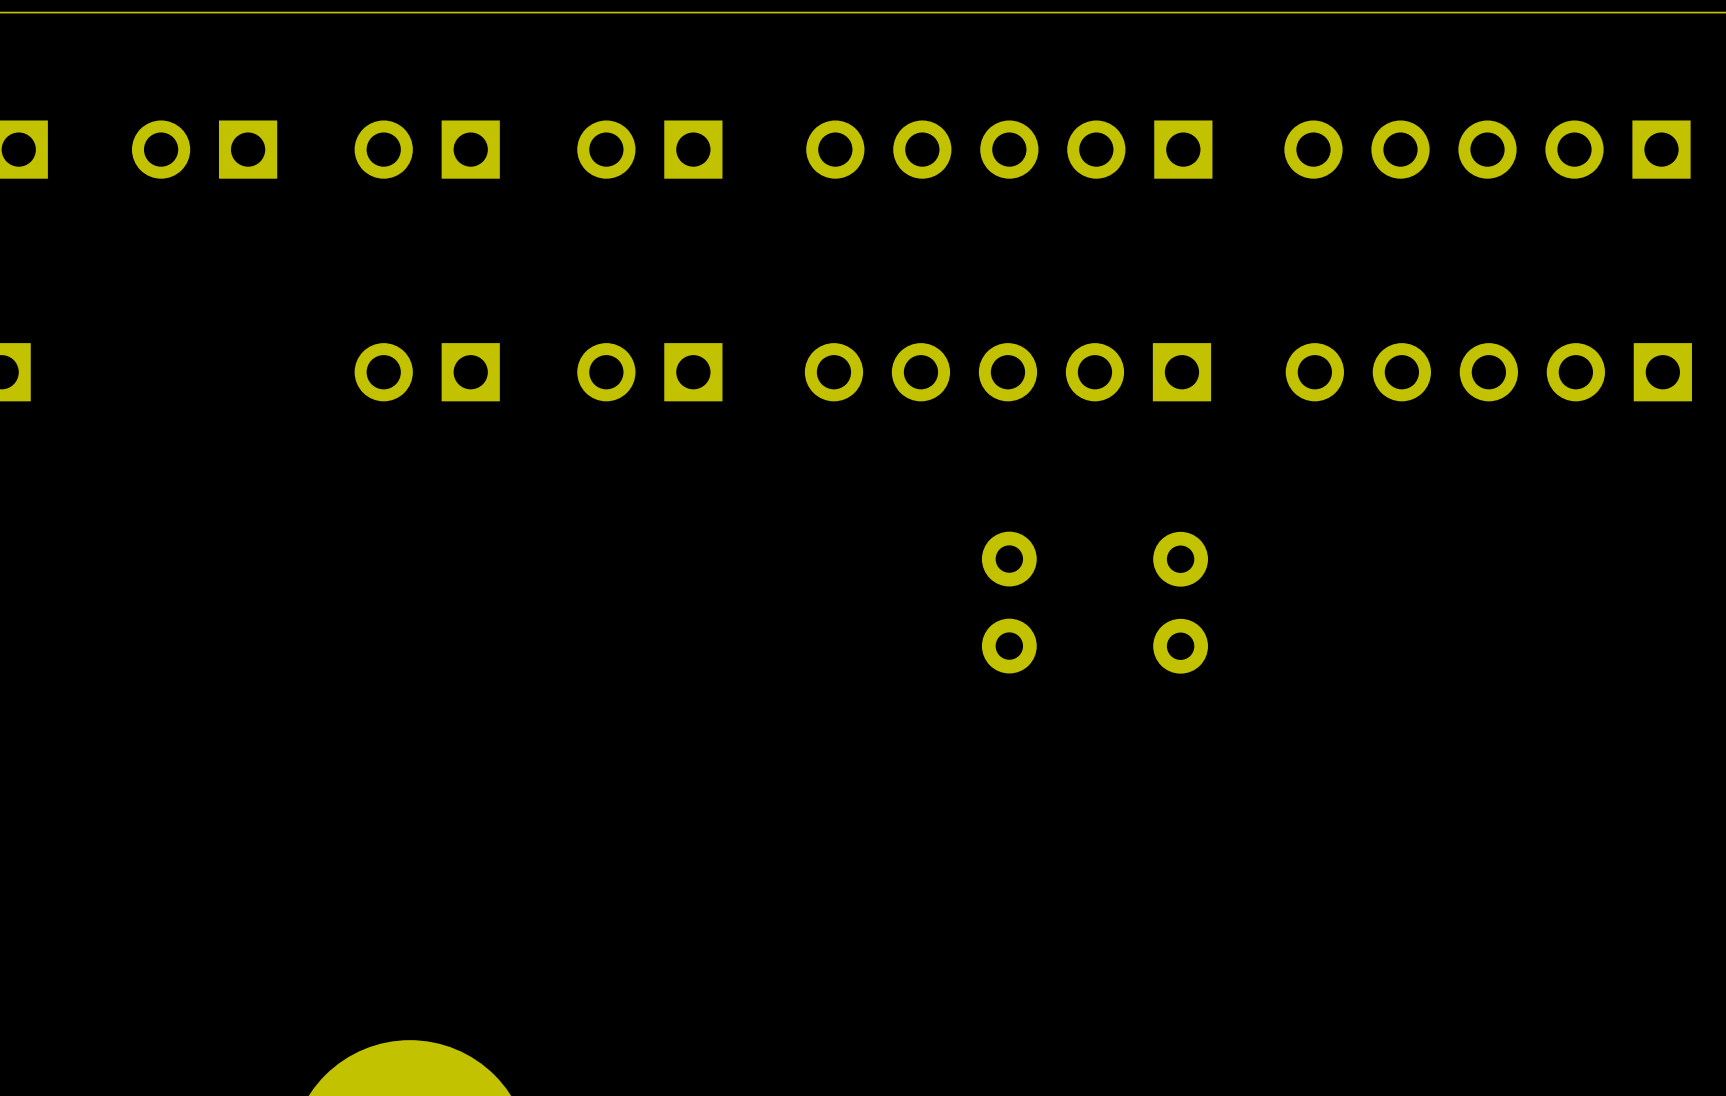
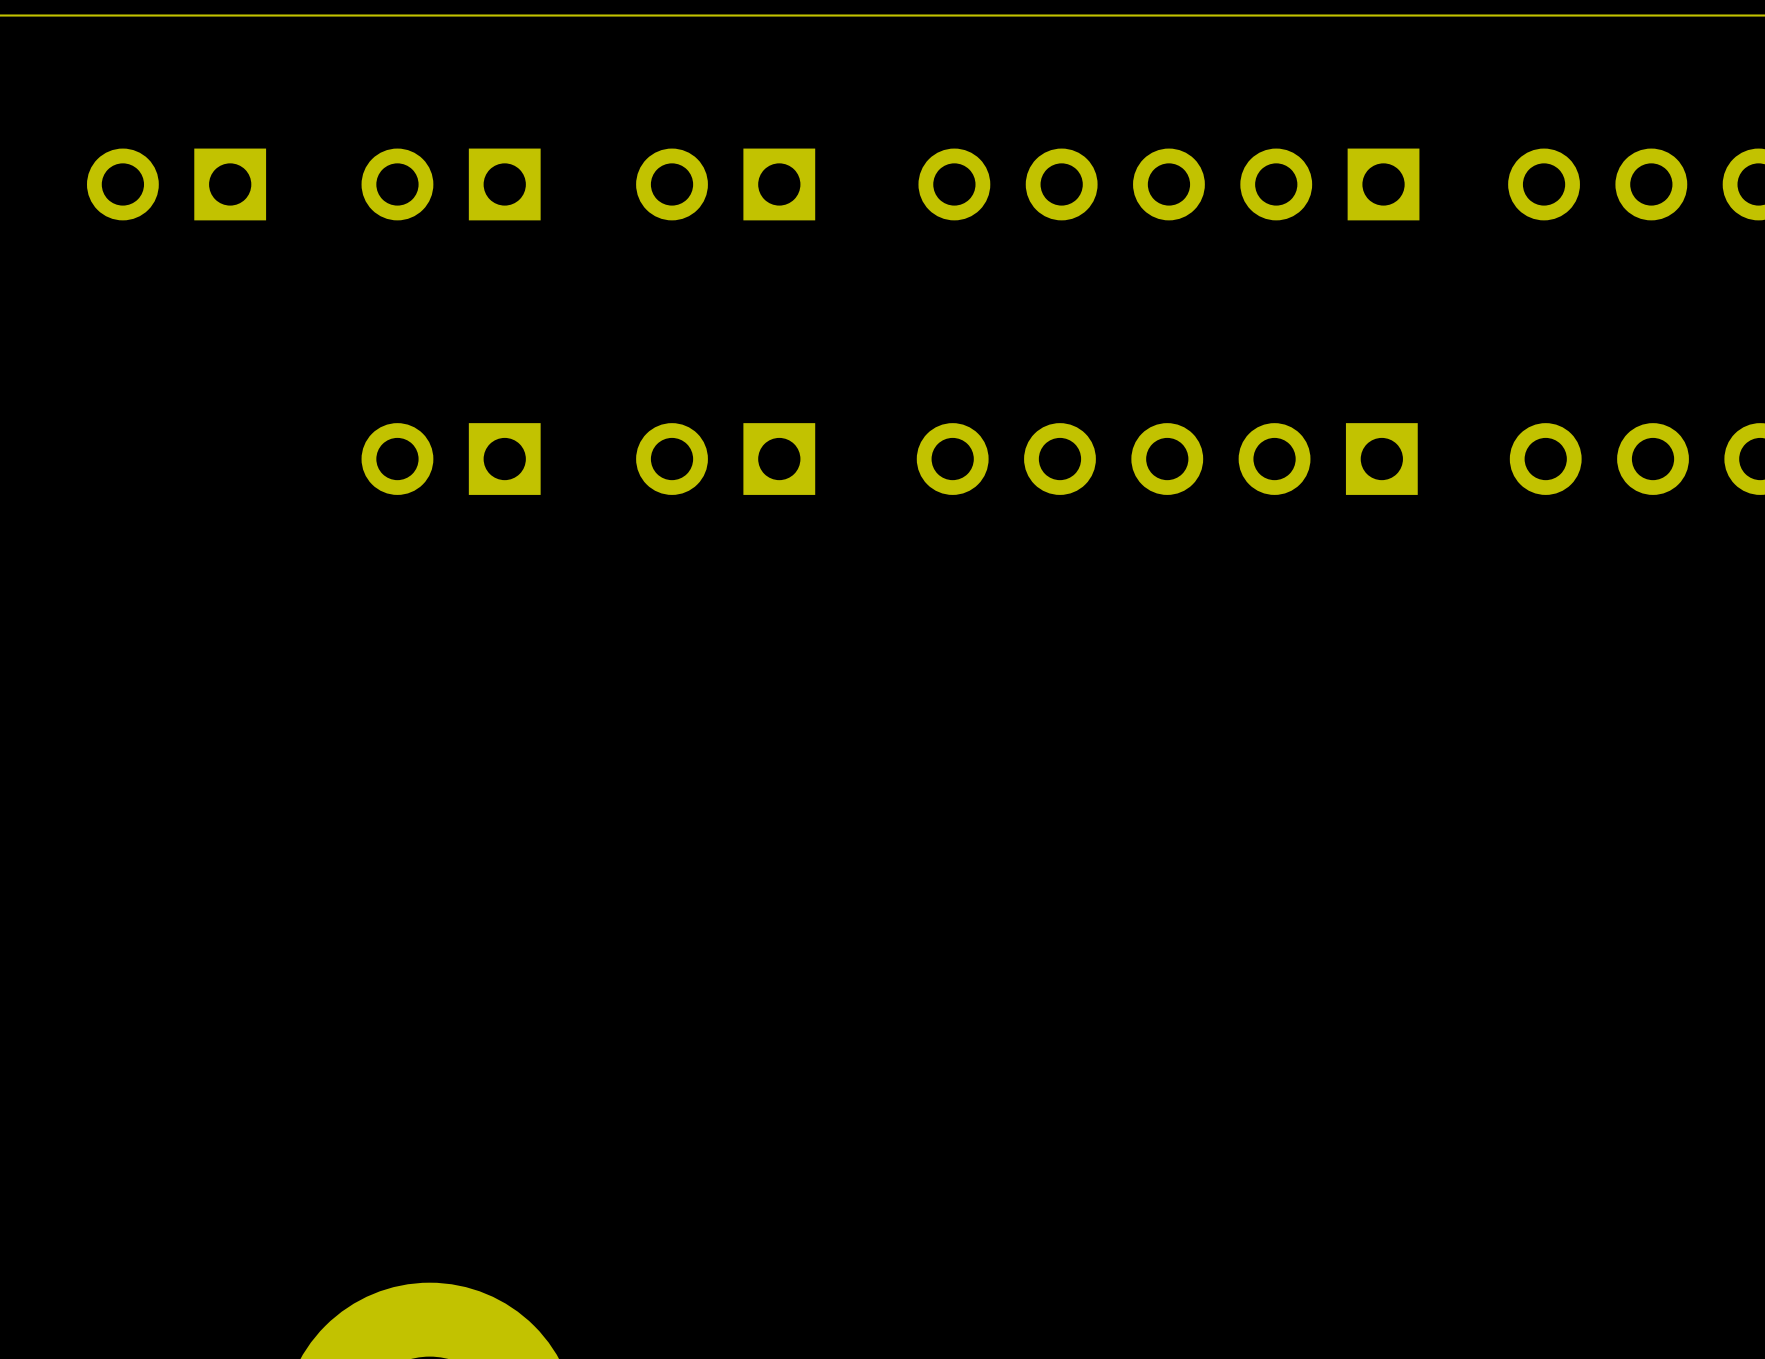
part: (1009, 602) -> none
part: (1180, 602) -> none

